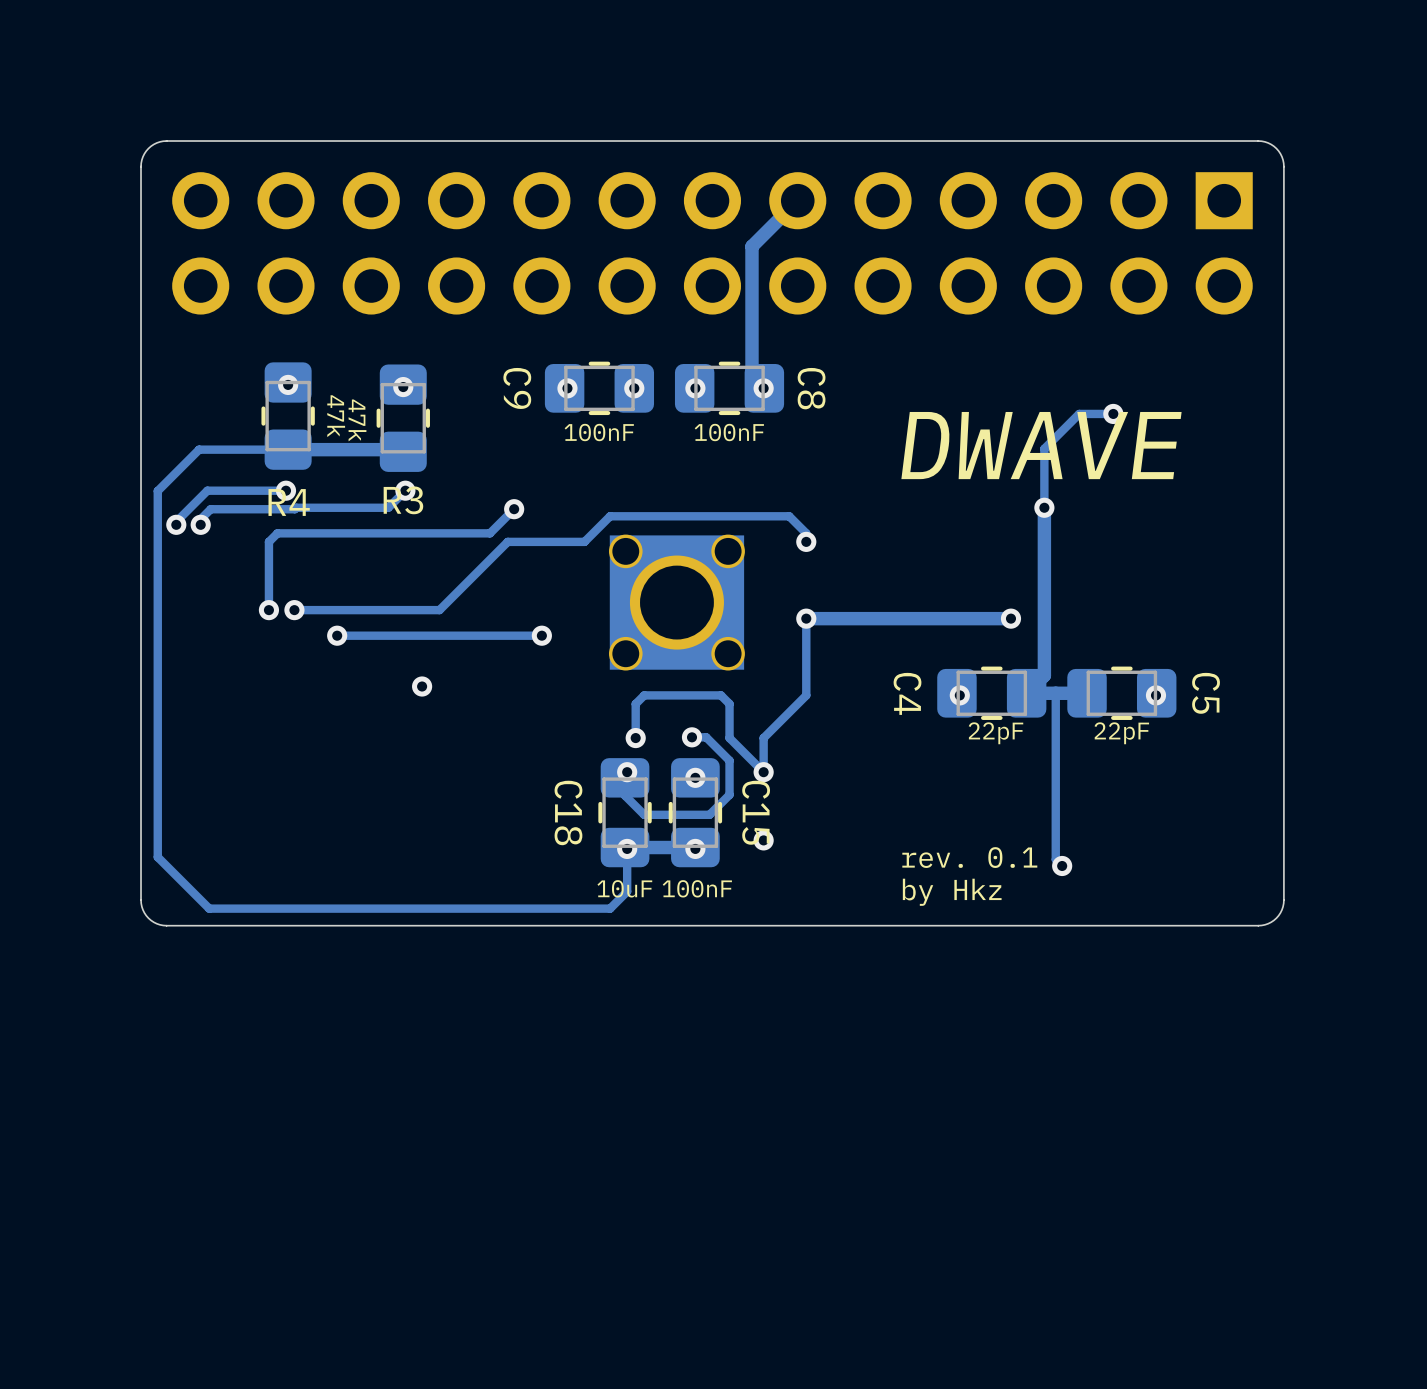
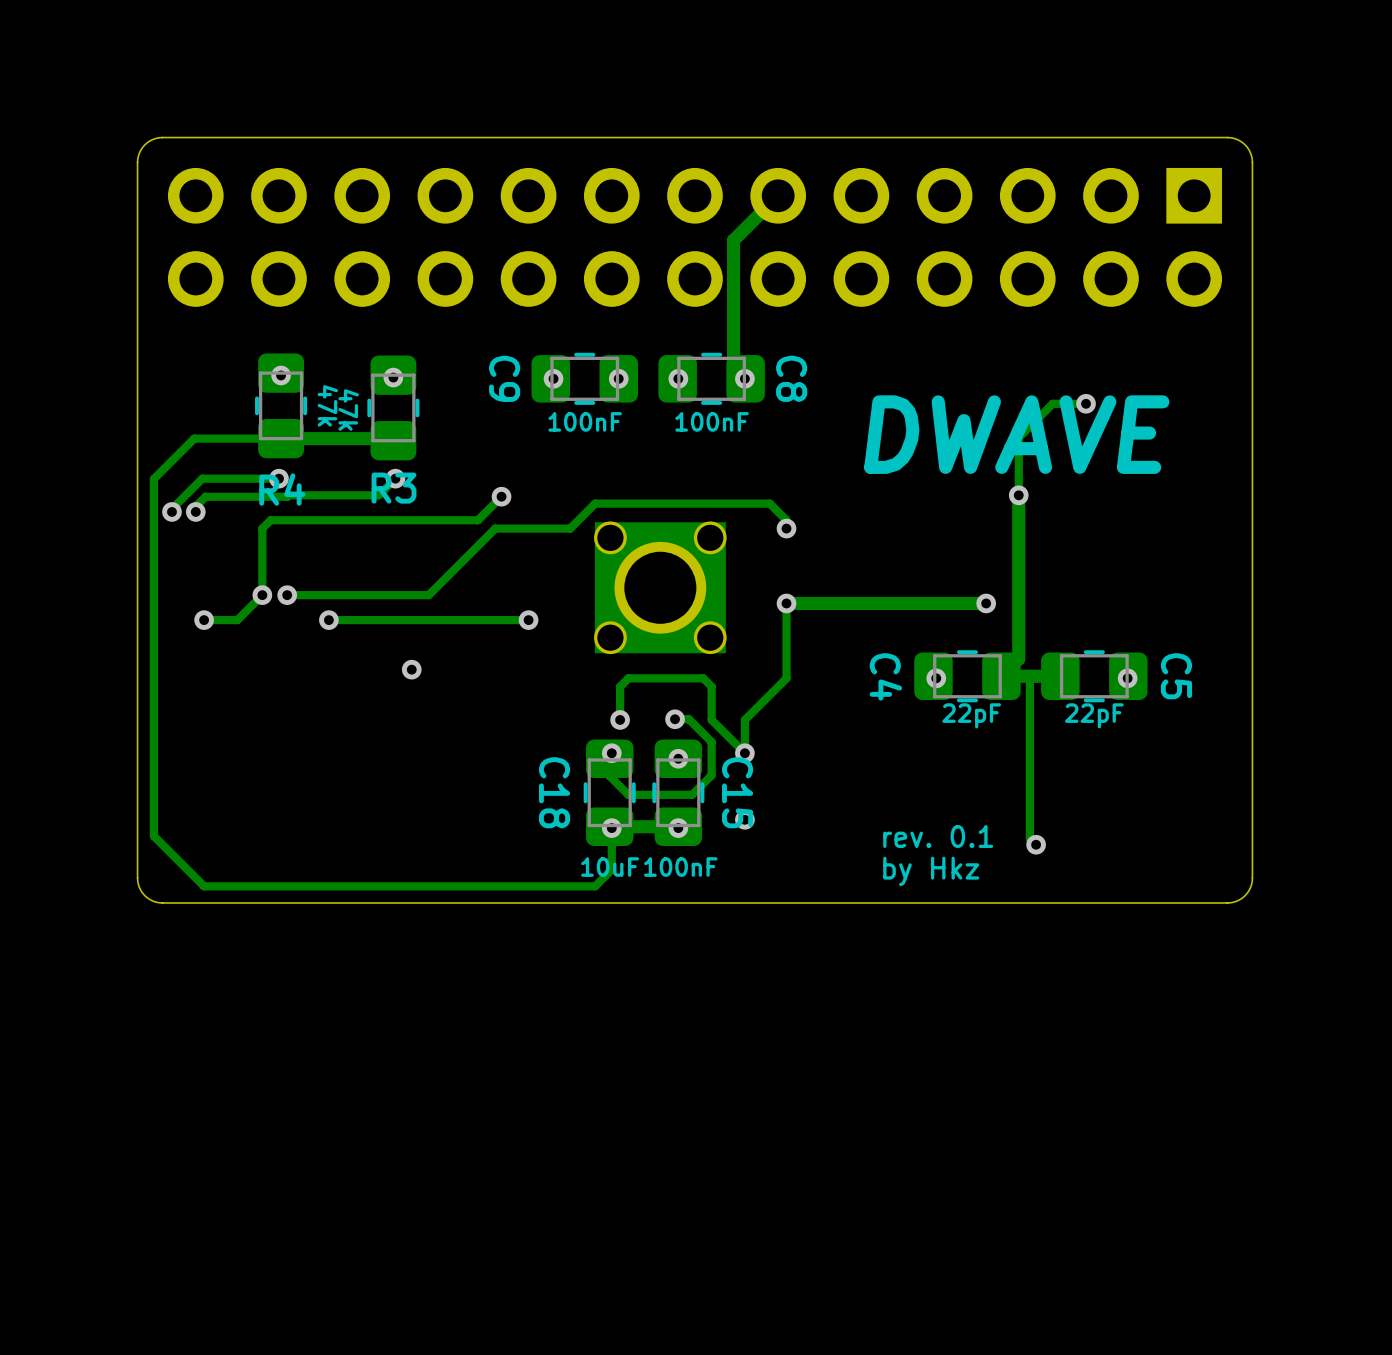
track: none -> (262, 595) (237, 620) (204, 620)
via: none -> (204, 620)

